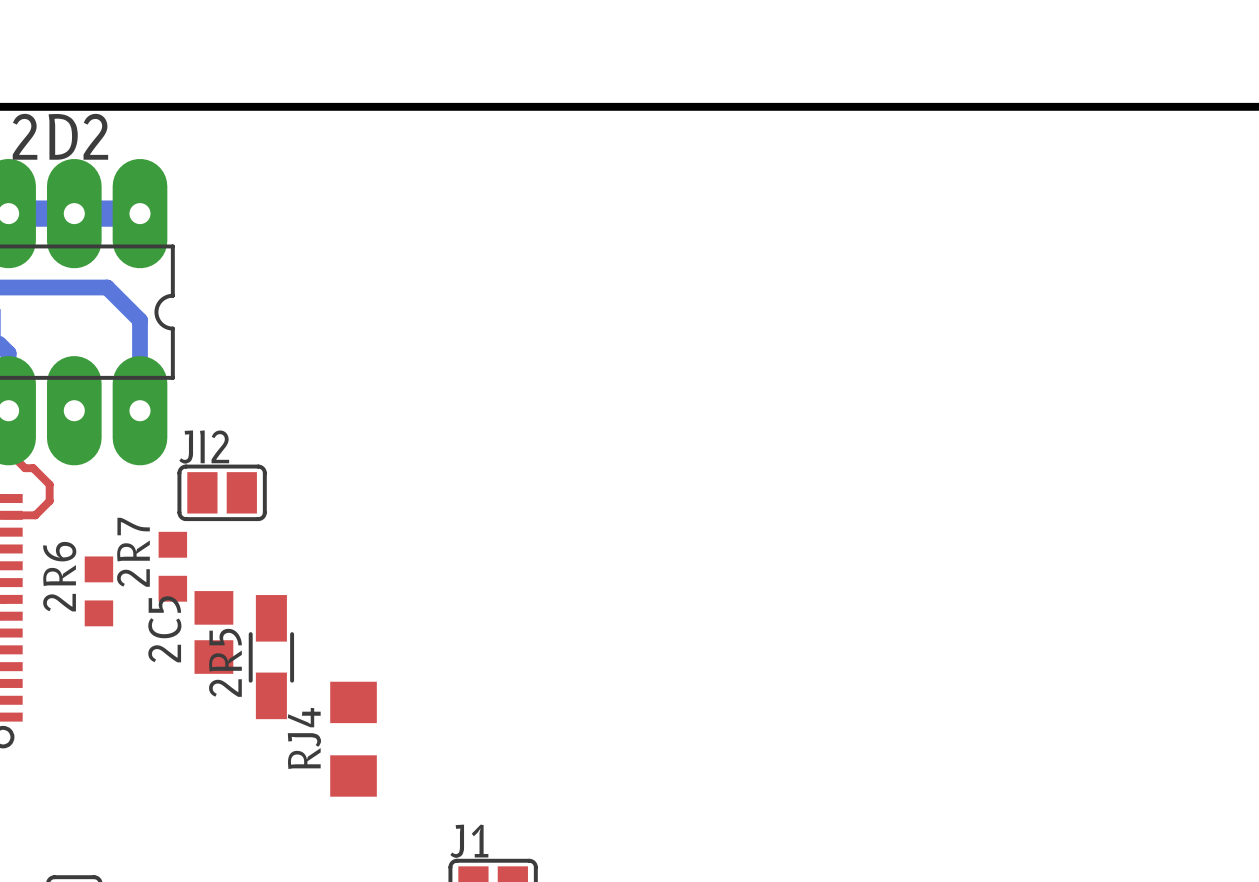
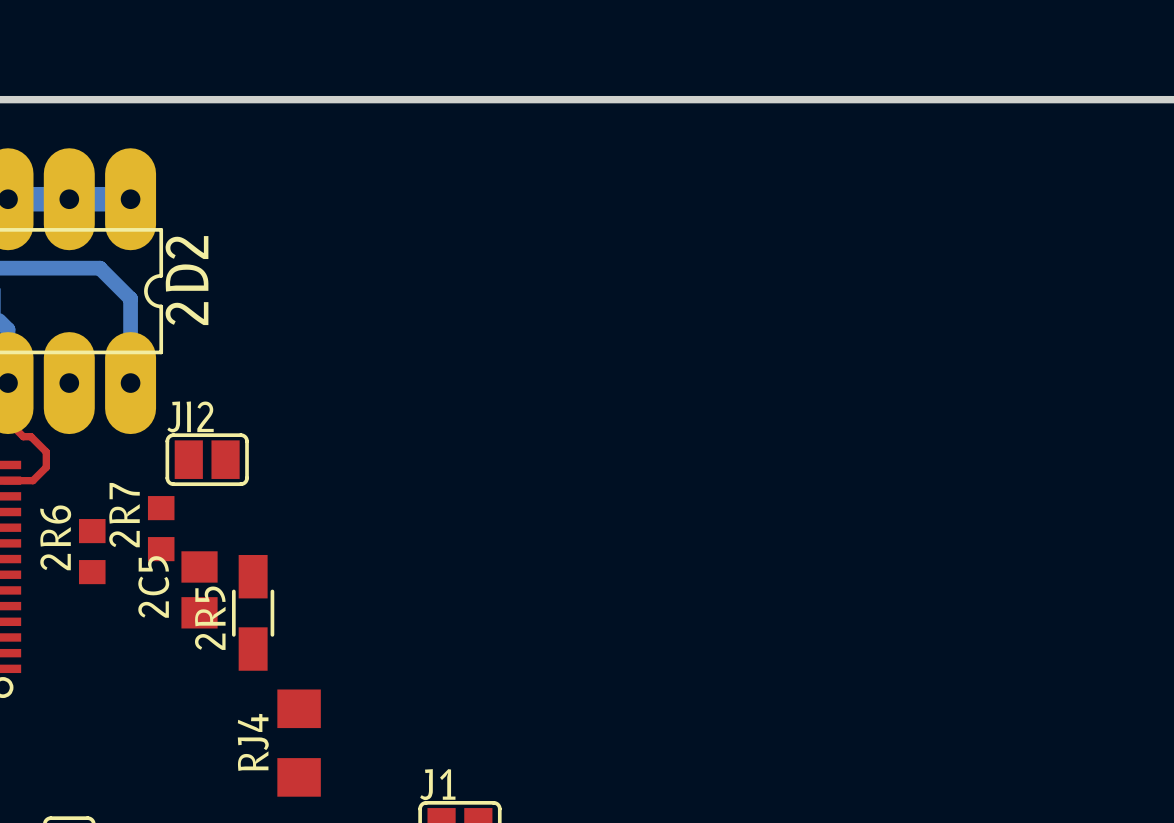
2D2 name rotation: 0° (60, 136) -> 90° counterclockwise (186, 280)
2D2 name position: 2D2 (60, 136) -> 2D2 (186, 280)
RJ4 position: (353, 739) -> (299, 743)

